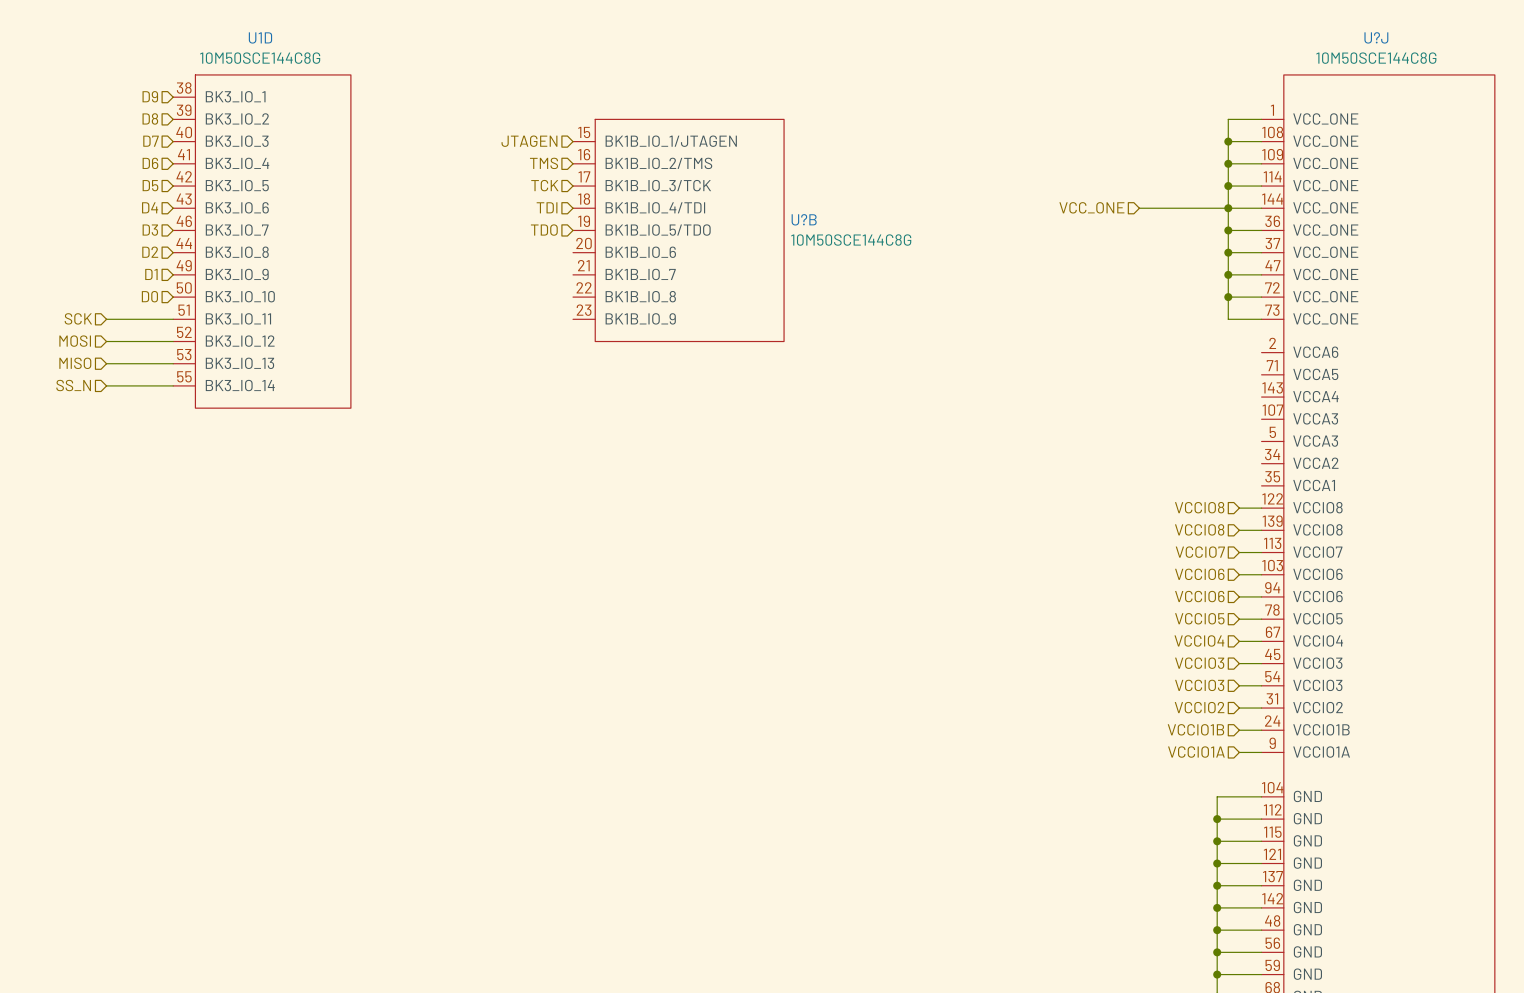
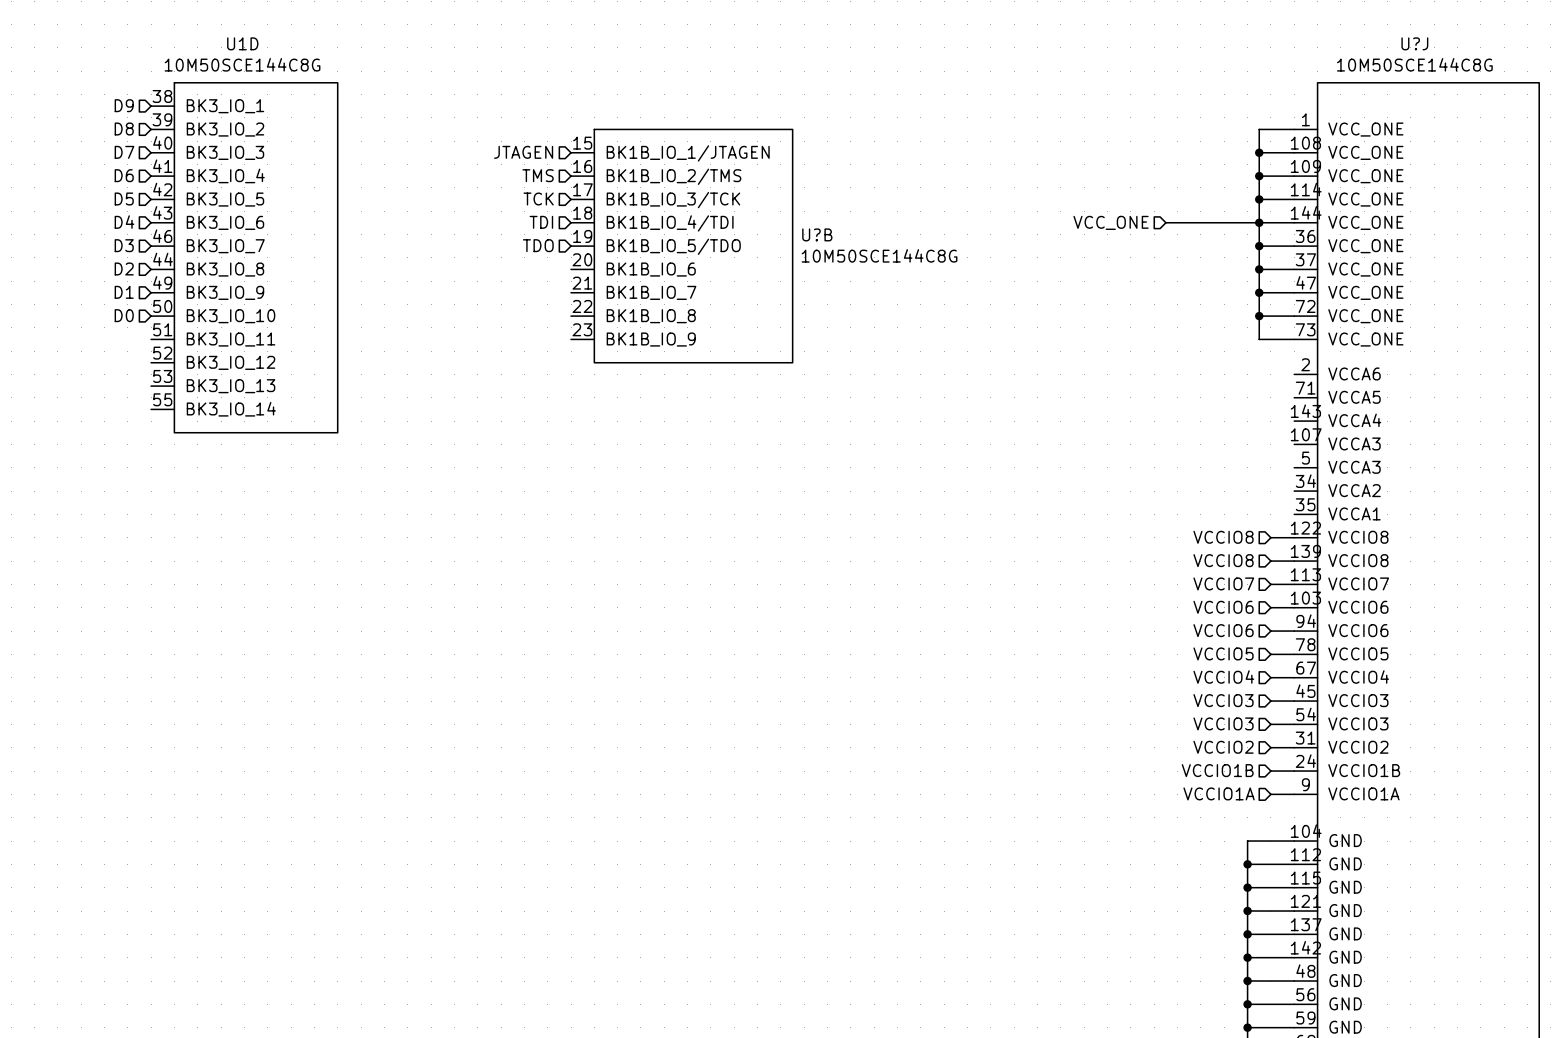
hierarchical label: SCK (78, 318) -> none
wire: (106, 319) (173, 319) -> none
hierarchical label: MOSI (75, 341) -> none
wire: (106, 341) (173, 341) -> none
hierarchical label: MISO (75, 363) -> none
wire: (106, 363) (173, 363) -> none
hierarchical label: SS_N (73, 385) -> none
wire: (106, 385) (173, 385) -> none

